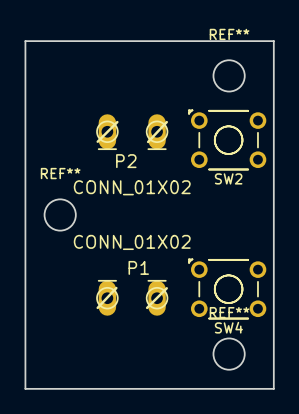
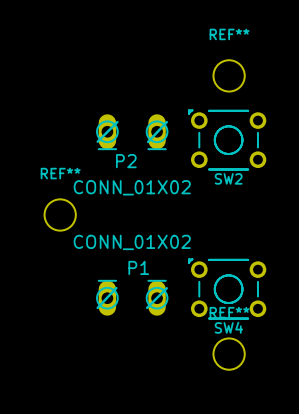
board edge: (25, 41) (25, 388) (273, 388) (273, 41) (25, 41) -> none

